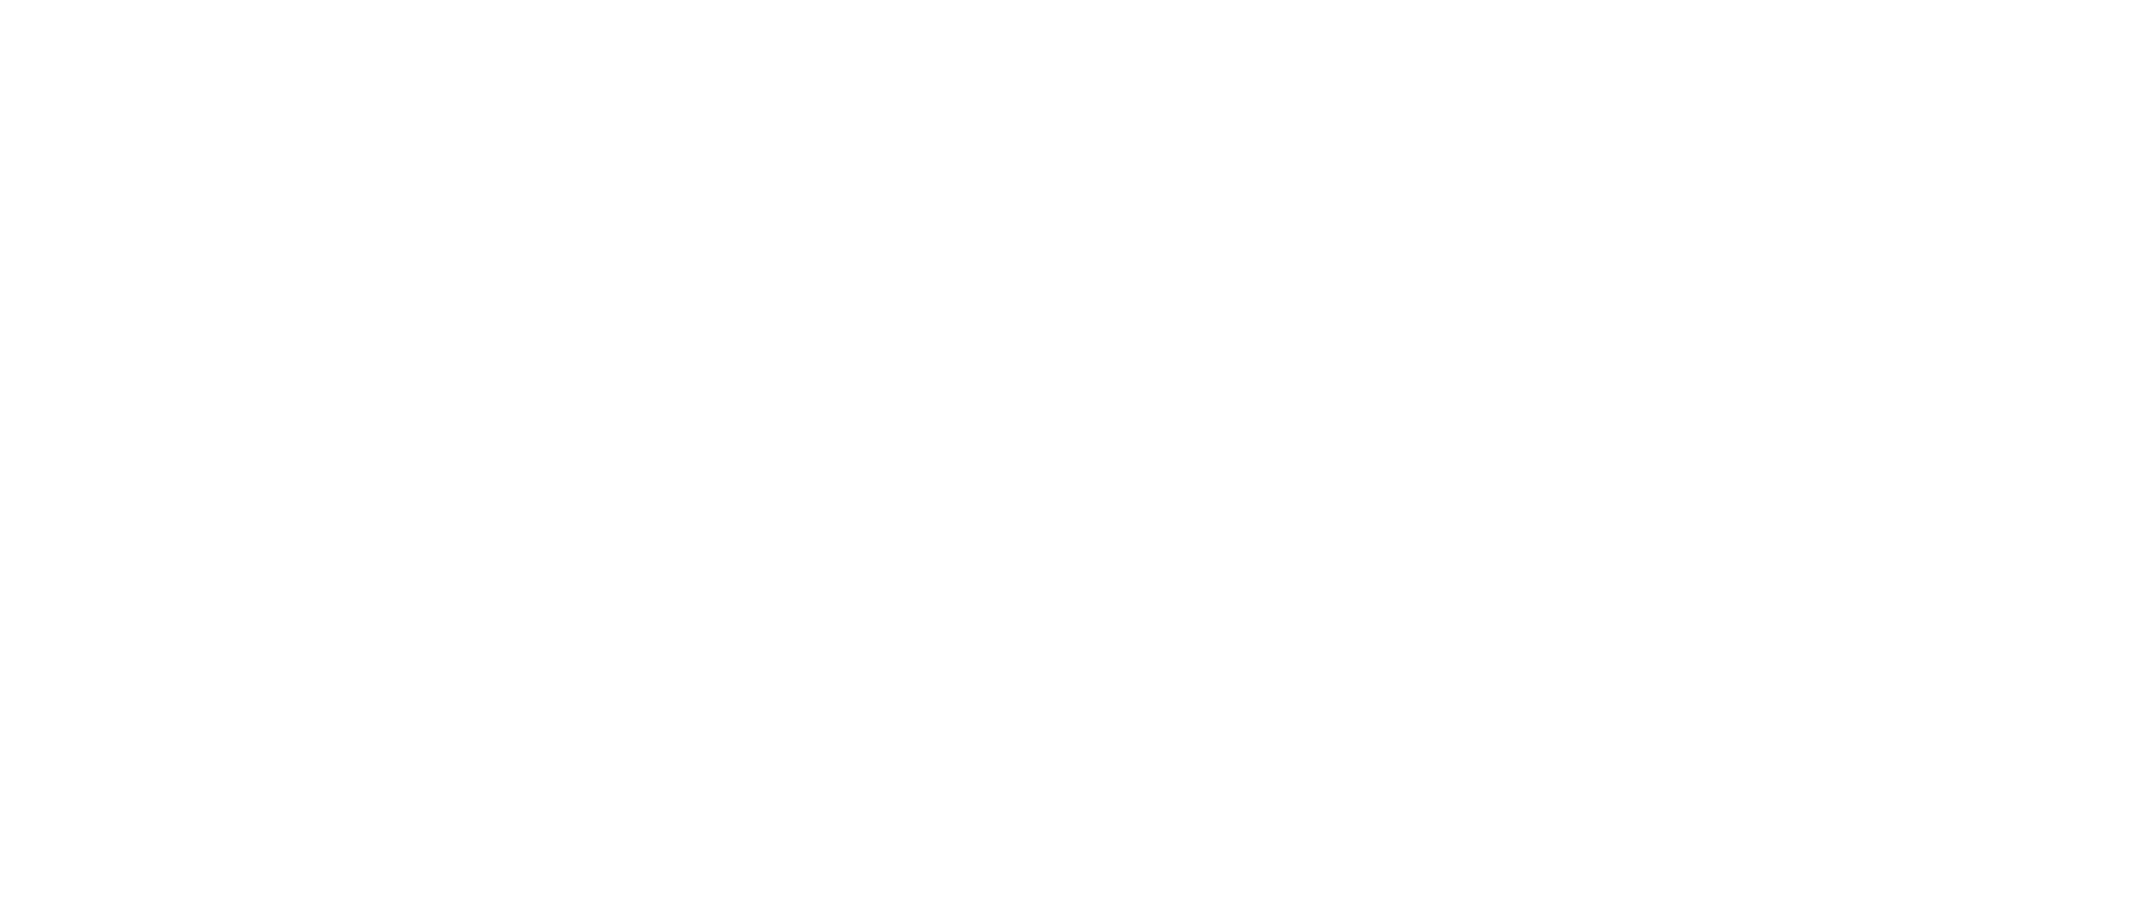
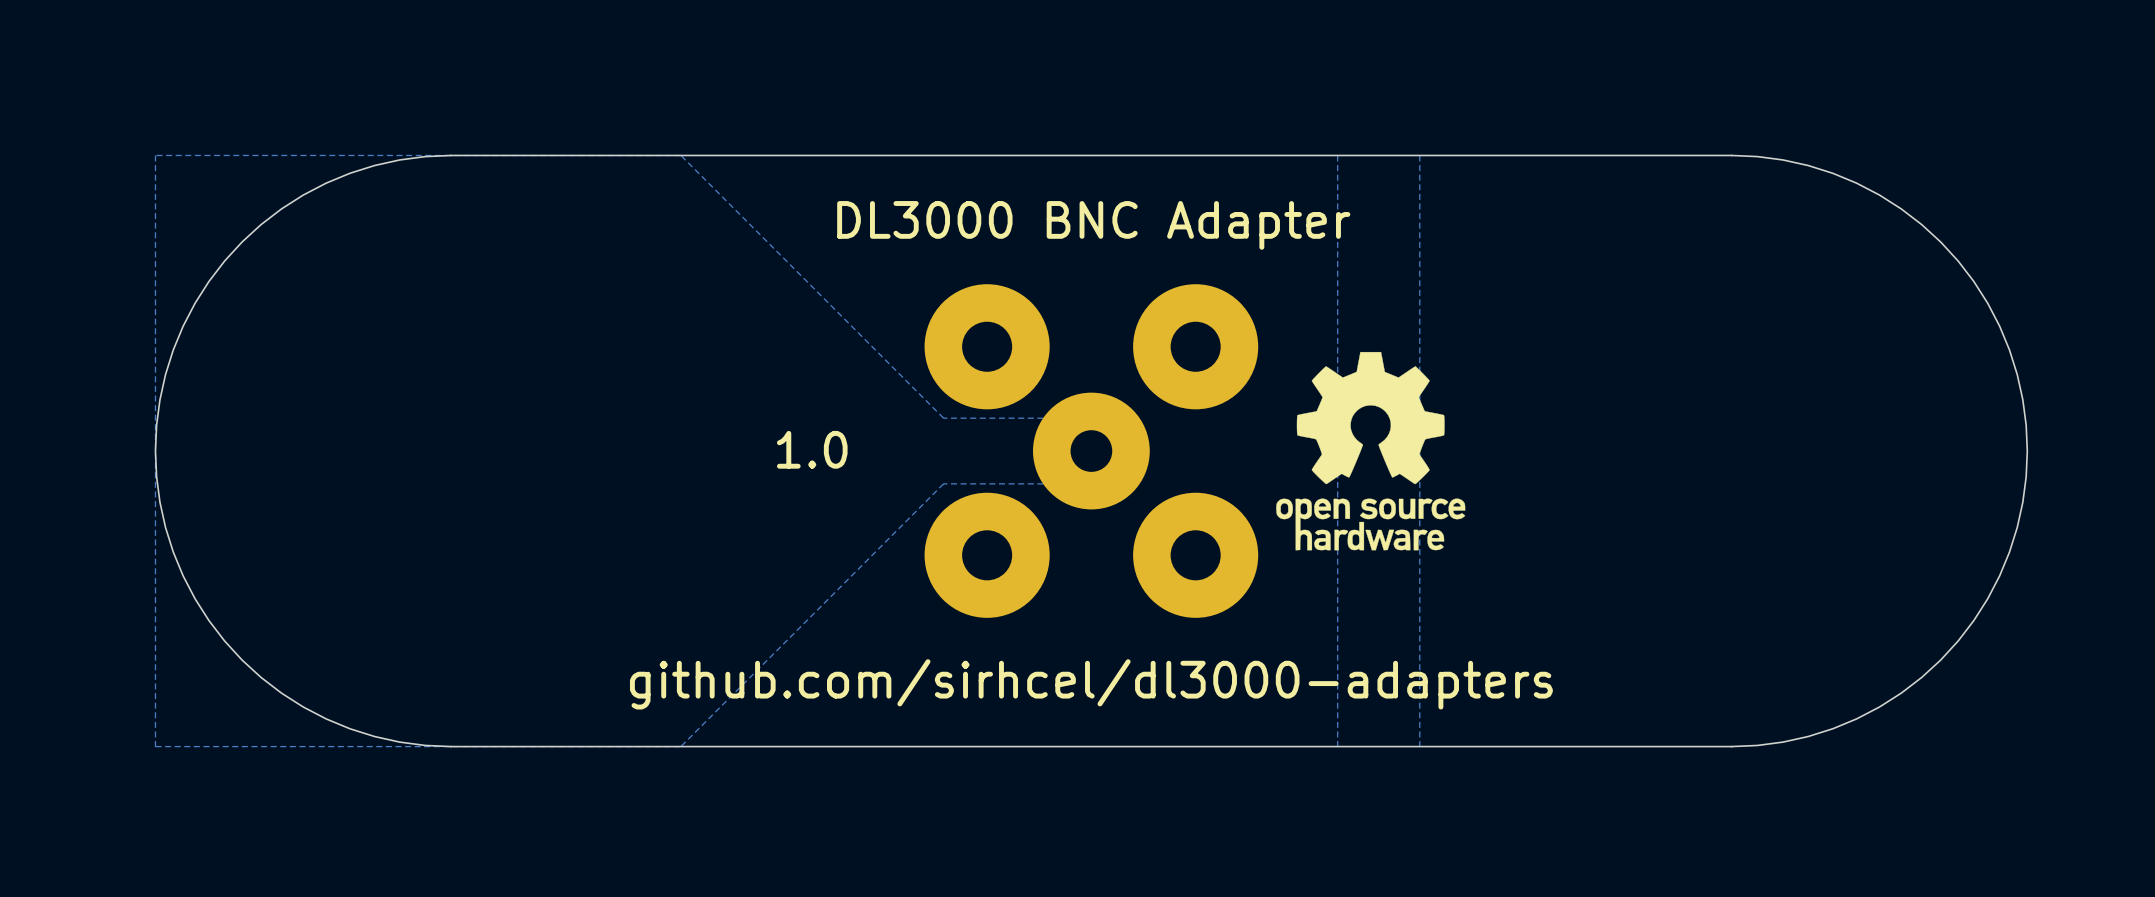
bottom zone outline: none -> (680, 155) (155, 155) (155, 746) (680, 746) (943, 483) (1091, 483) (1091, 418) (943, 418) (680, 155)
bottom zone outline: none -> (1337, 155) (1337, 746)
bottom zone outline: none -> (1419, 155) (1419, 746)
board edge: none -> (1731, 155) (451, 155) (425, 156) (374, 165) (326, 183) (281, 208) (261, 224) (224, 261) (195, 303) (183, 326) (165, 374) (156, 425) (156, 476) (165, 527) (183, 575) (208, 620) (224, 641) (261, 677) (281, 693) (326, 718) (374, 736) (425, 745) (1731, 746) (1757, 745) (1808, 736) (1856, 718) (1901, 693) (1921, 677) (1958, 641) (1987, 598) (2009, 552) (2022, 502) (2027, 451) (2022, 399) (2009, 349) (1987, 303) (1958, 261) (1921, 224) (1879, 195) (1832, 173) (1783, 159) (1731, 155)
text: none -> DL3000 BNC Adapter (1093, 225)
drawing: none -> [1276, 351, 1466, 551]
text: none -> 1.0 (812, 449)
part: none -> (1091, 451)
text: none -> github.com/sirhcel/dl3000-adapters (1091, 684)

